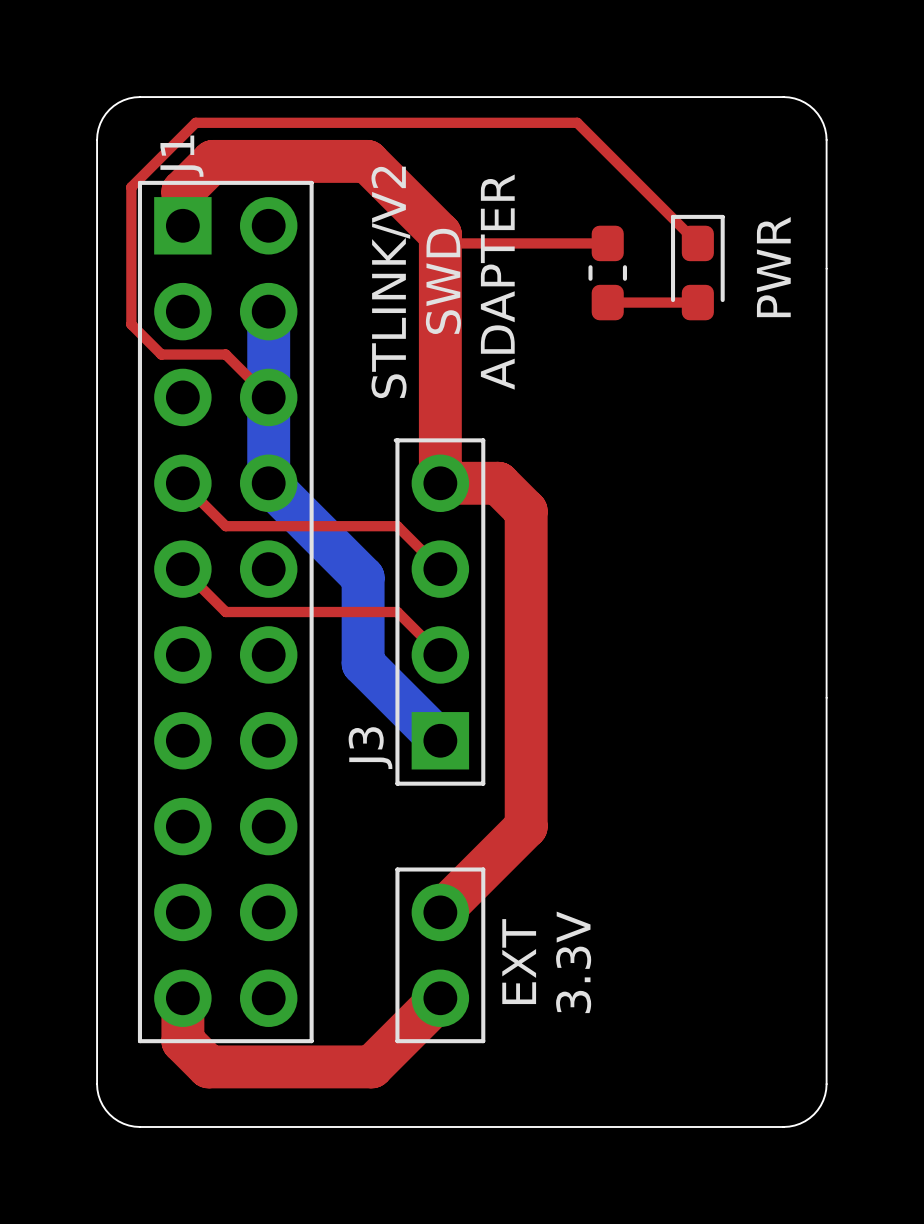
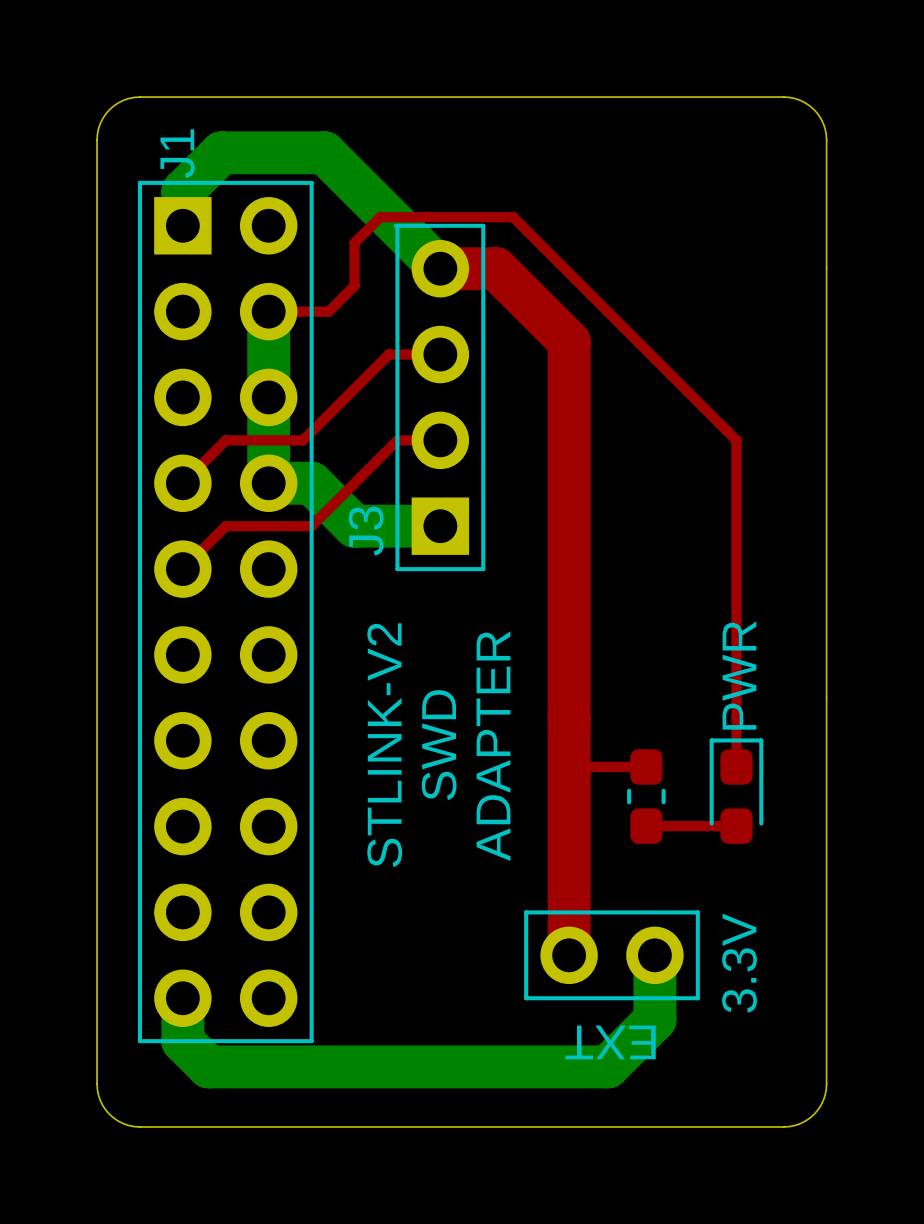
top track: (182, 225) (182, 191) (212, 161) (367, 161) (440, 234) -> none
bottom track: none -> (182, 225) (182, 191) (221, 152) (324, 152) (440, 268)
top track: (440, 234) (449, 243) (607, 243) -> none
top track: (440, 234) (440, 483) (498, 483) (526, 511) (526, 826) (440, 912) -> none
top track: (697, 243) (577, 122) (195, 122) (131, 187) (131, 324) (161, 354) (225, 354) (268, 397) -> none
part position: (697, 267) -> (736, 791)
text position: PWR (773, 267) -> PWR (739, 675)
top track: none -> (440, 268) (496, 268) (569, 341) (569, 955)
part position: (607, 273) -> (646, 796)
text position: SWD (443, 281) -> SWD (439, 745)
text: STLINK/V2 (390, 282) -> none
text position: ADAPTER (497, 282) -> ADAPTER (493, 746)
top track: (607, 302) (697, 302) -> (646, 826) (736, 826)
top track: none -> (268, 311) (328, 311) (354, 285) (354, 242) (380, 217) (513, 217) (736, 440) (736, 766)
top track: none -> (440, 354) (388, 354) (303, 440) (225, 440) (182, 483)
top track: (182, 483) (225, 526) -> (182, 569) (225, 526)
bottom track: (268, 483) (363, 577) (363, 663) (440, 740) -> (268, 483) (311, 483) (354, 526) (440, 526)
top track: (311, 526) (397, 526) (440, 569) -> (311, 526) (397, 440) (440, 440)
top track: (182, 569) (225, 612) (397, 612) (440, 654) -> none
J3 position: (439, 612) -> (439, 397)
text: none -> STLINK-V2 (384, 745)
top track: none -> (578, 766) (646, 766)
part rotation: 0° (440, 955) -> 90° clockwise (612, 955)
part position: (440, 955) -> (612, 955)
bottom track: none -> (654, 955) (654, 1019) (607, 1066) (208, 1066) (182, 1041) (182, 998)
text rotation: 0° (519, 961) -> 90° counterclockwise (610, 1042)
text position: EXT (519, 961) -> EXT (610, 1042)
text position: 3.3V (573, 962) -> 3.3V (739, 963)
top track: (182, 998) (182, 1041) (208, 1066) (371, 1066) (440, 998) -> none

